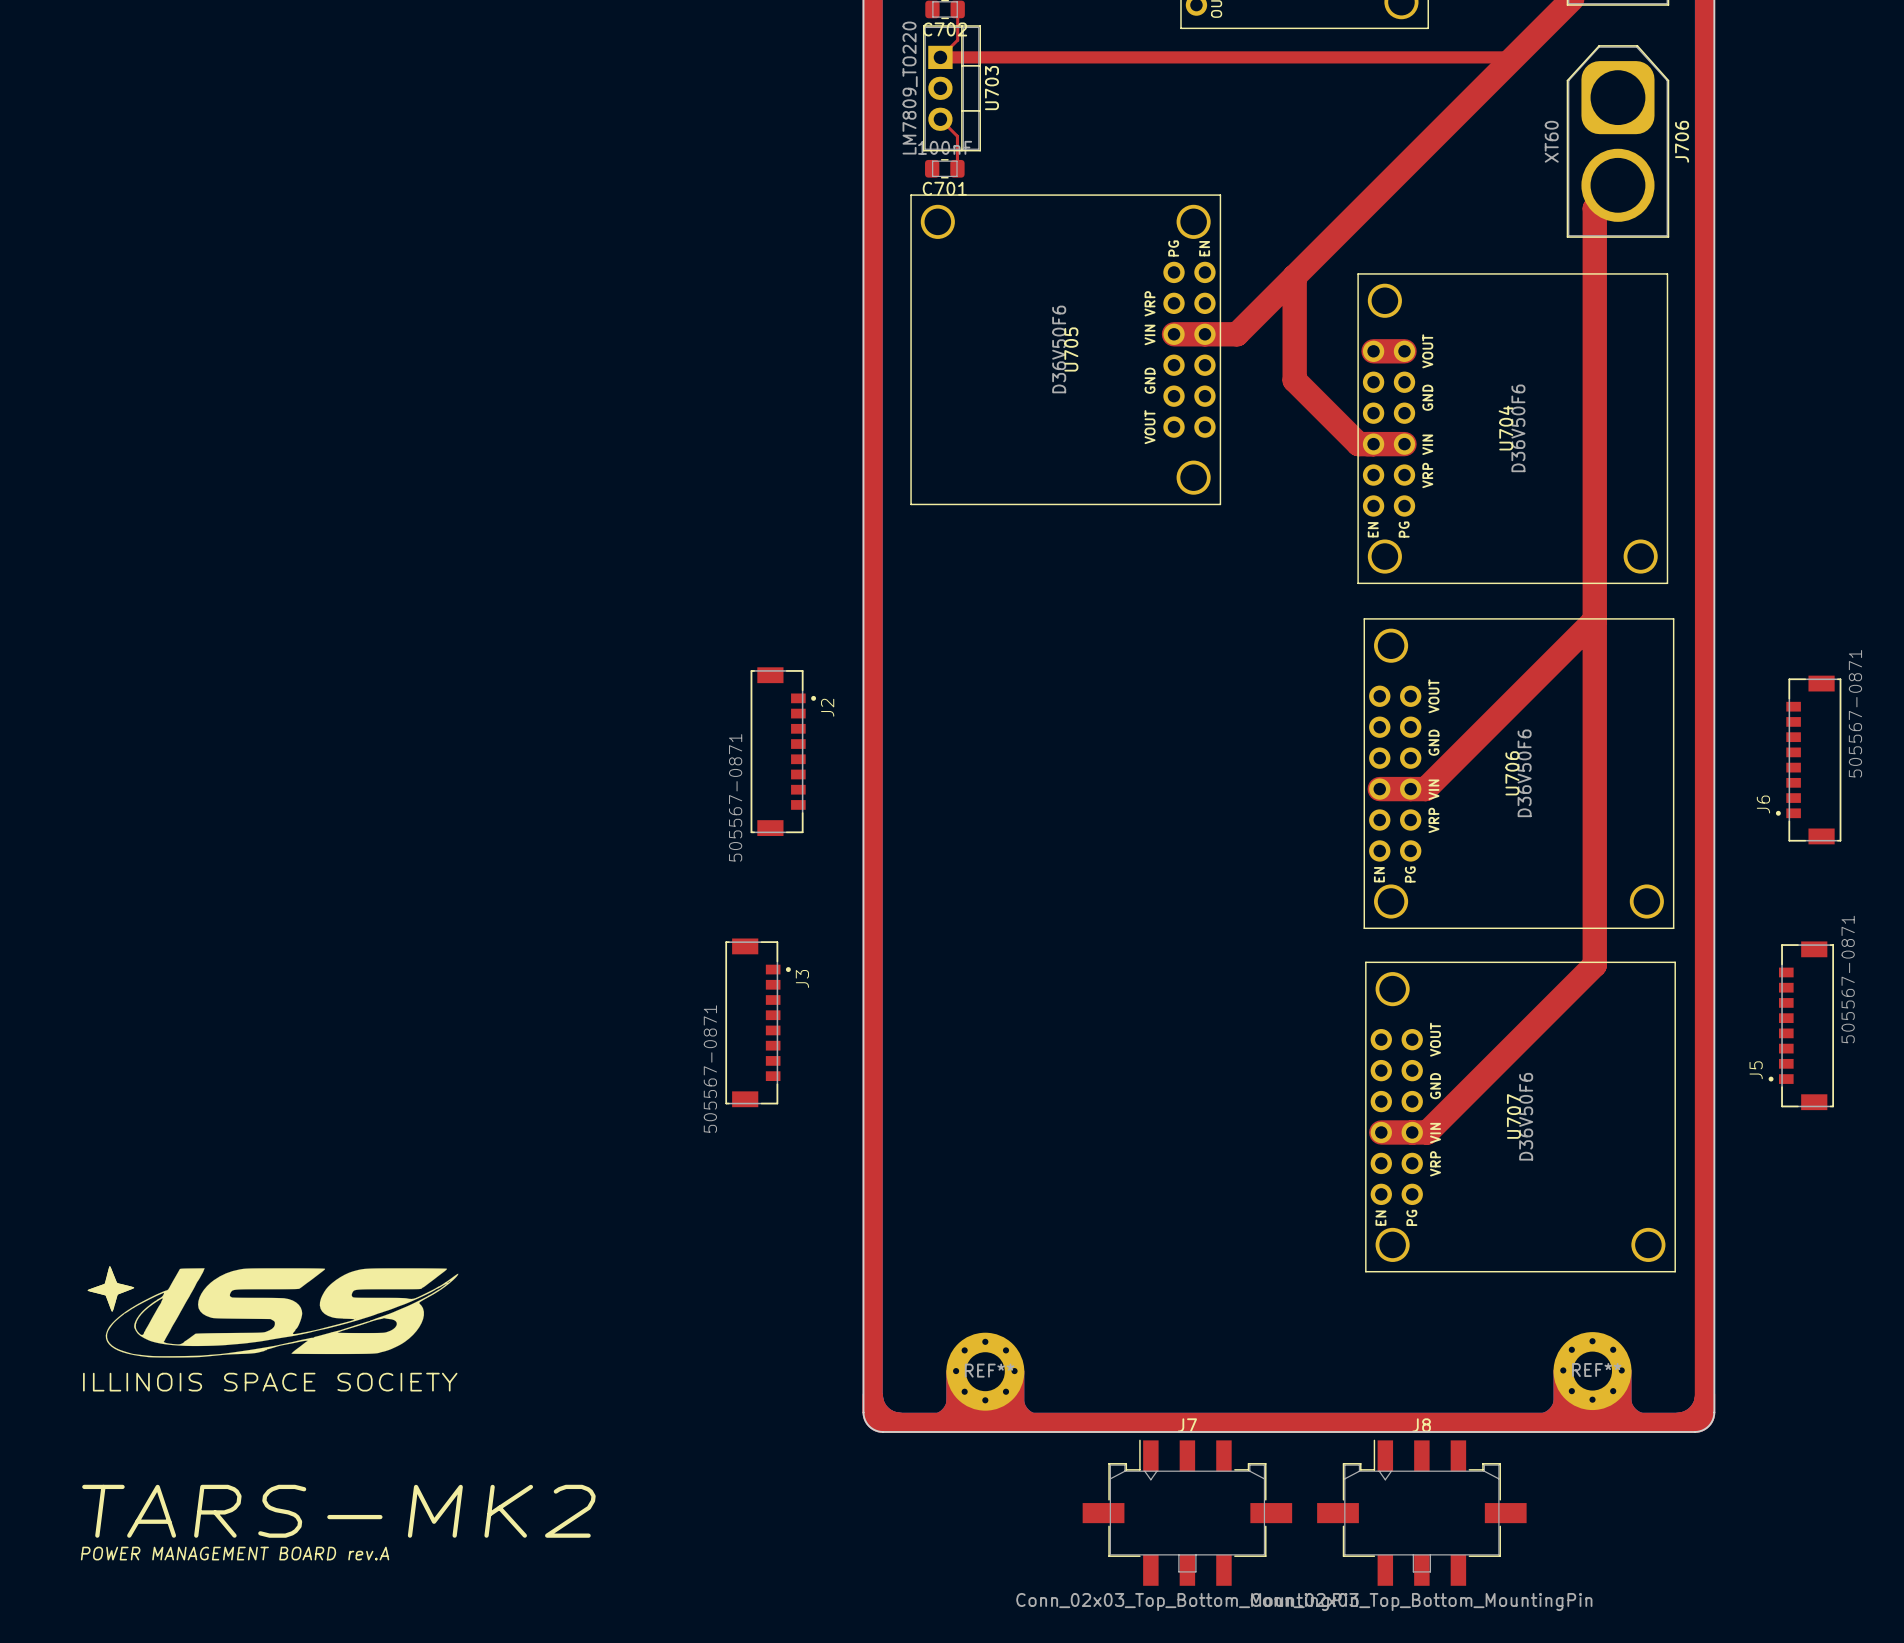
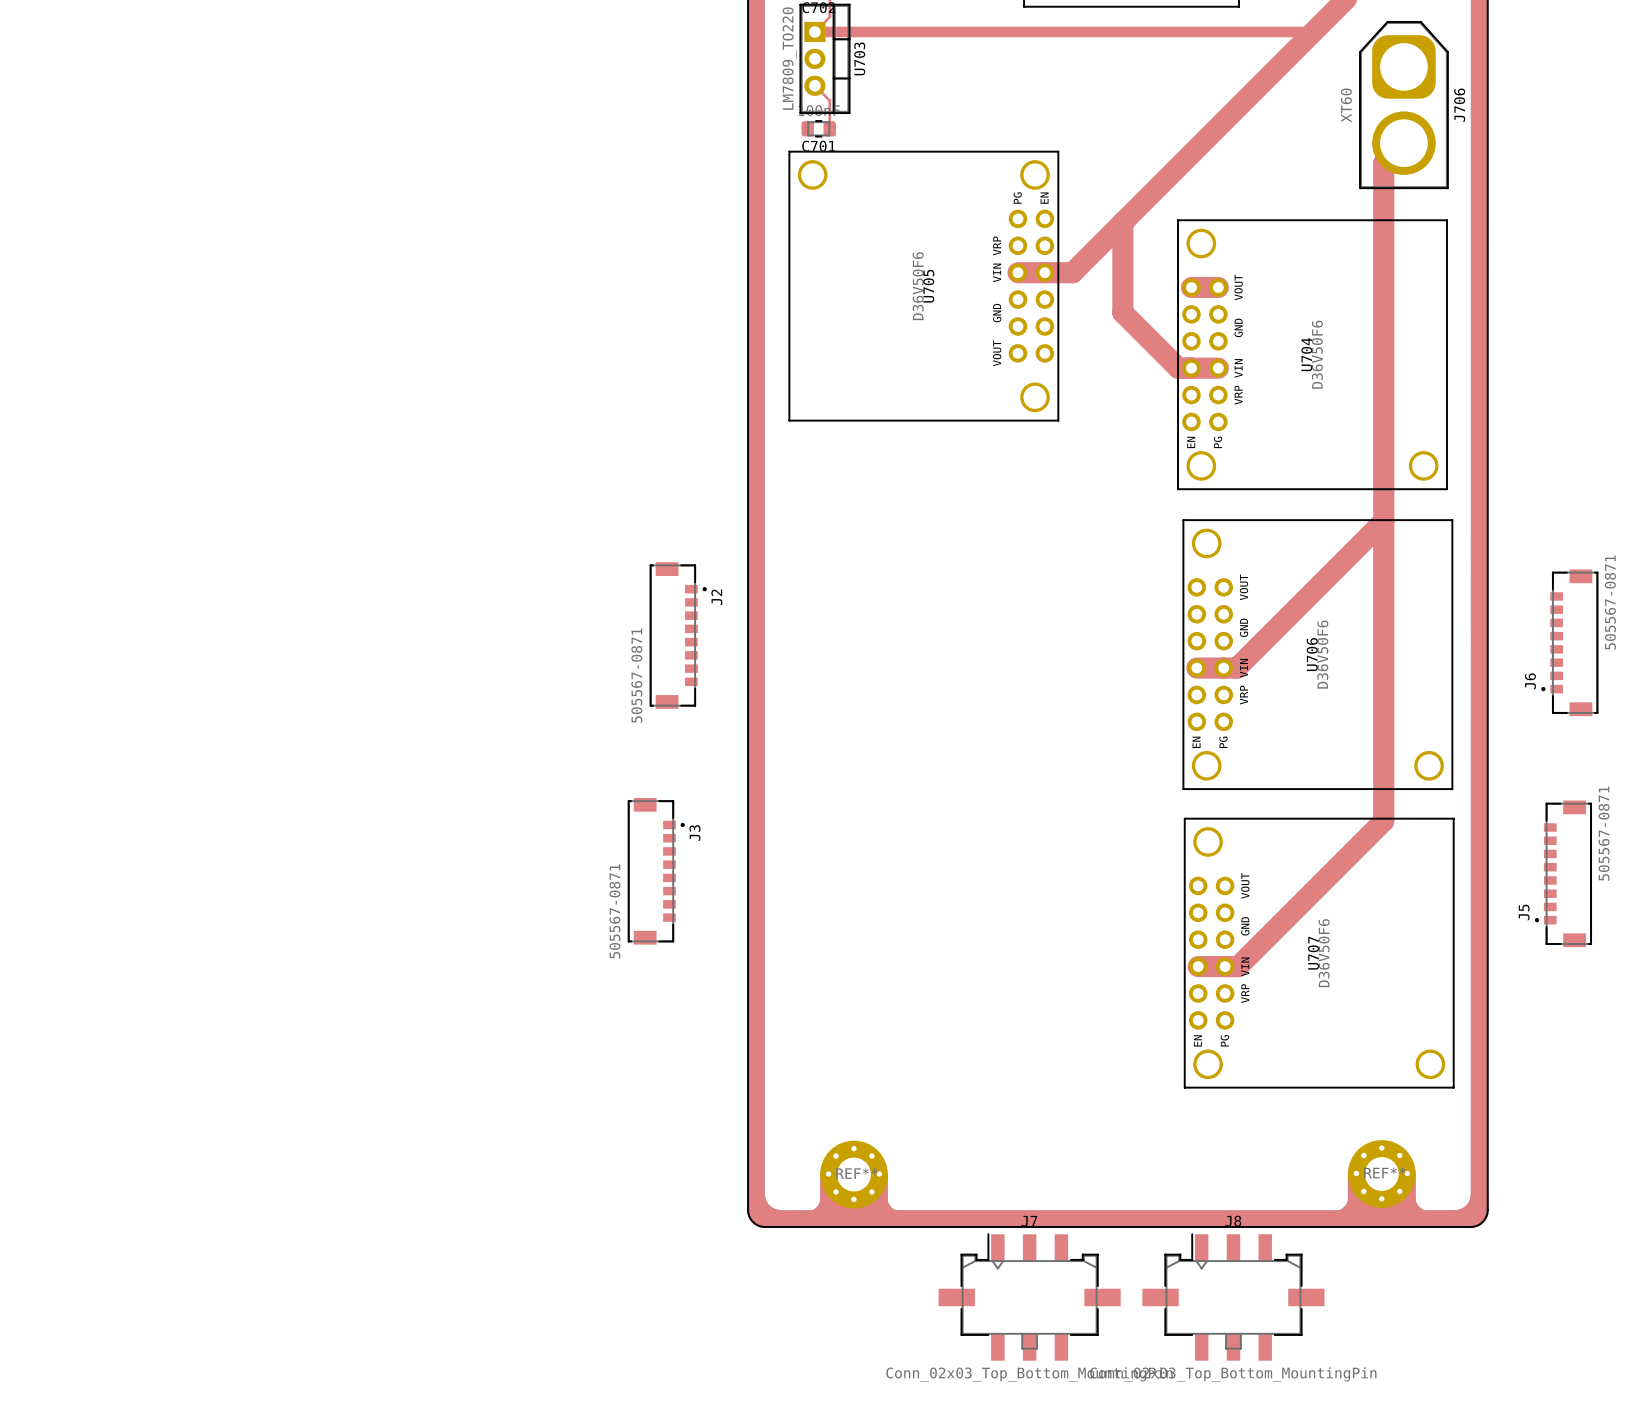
drawing: [87, 1266, 459, 1358] -> none
text: ILLINOIS SPACE SOCIETY (270, 1382) -> none
text: TARS-MK2 (338, 1511) -> none
text: POWER MANAGEMENT BOARD rev.A (235, 1553) -> none

